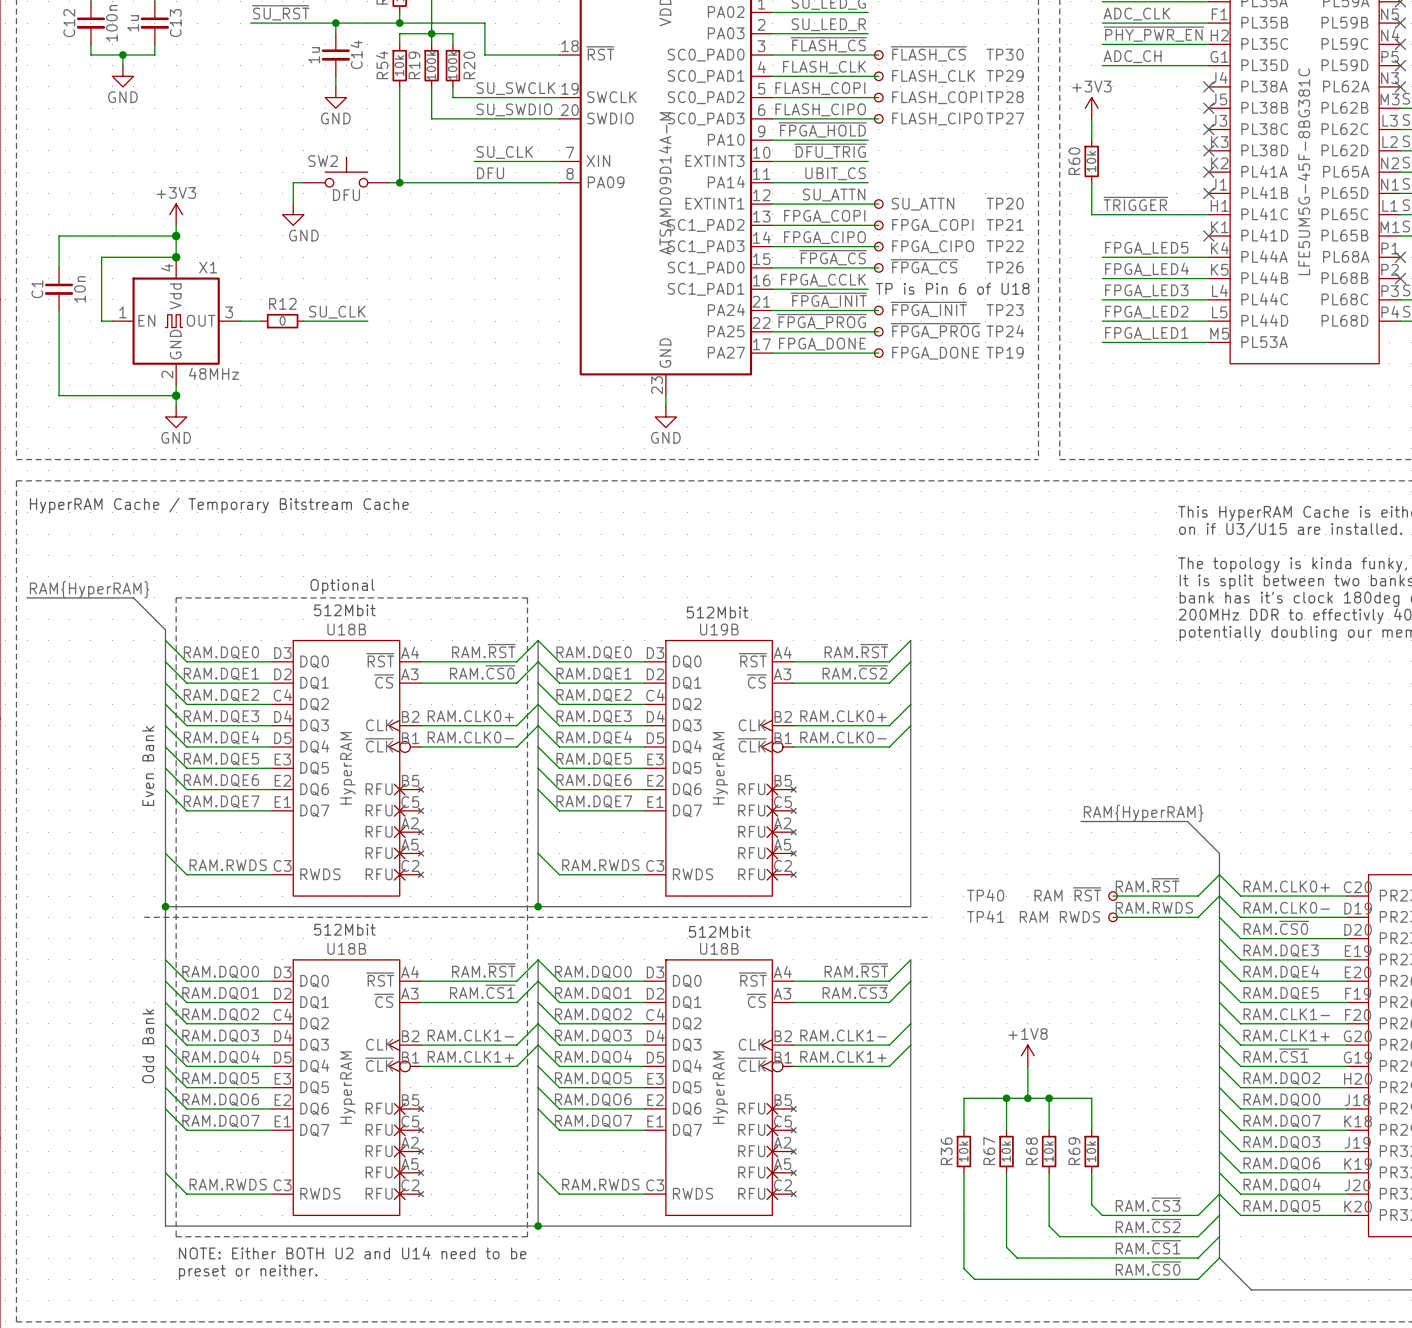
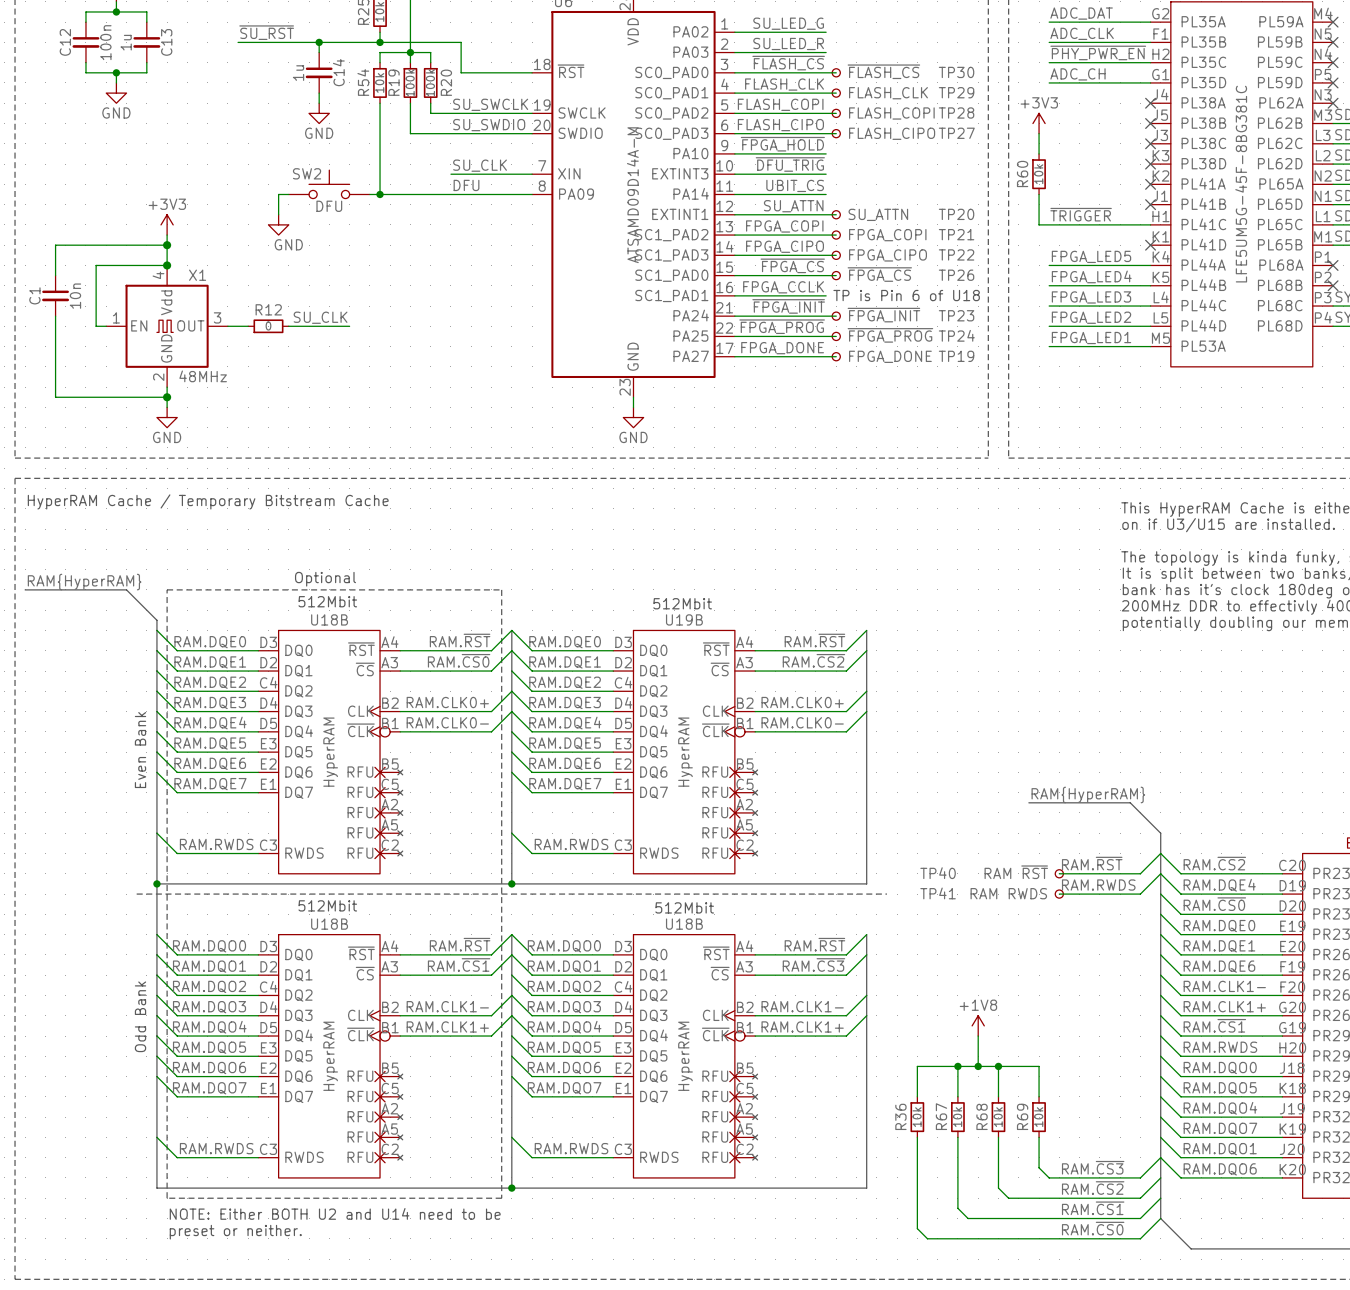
label: RAM.CLK0+ (1286, 886) -> RAM.~{CS2} (1214, 863)
label: RAM.CLK0- (1286, 907) -> RAM.DQE4 (1219, 885)
label: RAM.DQE3 (1281, 950) -> RAM.DQE0 (1219, 926)
label: RAM.DQE4 (1281, 971) -> RAM.DQE1 (1219, 946)
label: RAM.DQE5 (1281, 993) -> RAM.DQE6 (1219, 966)
label: RAM.DQO2 (1281, 1078) -> RAM.RWDS (1220, 1047)
label: RAM.DQO7 (1282, 1121) -> RAM.DQO5 (1220, 1088)
label: RAM.DQO3 (1281, 1142) -> RAM.DQO4 (1220, 1108)
label: RAM.DQO6 (1281, 1163) -> RAM.DQO7 (1220, 1128)
label: RAM.DQO4 (1282, 1184) -> RAM.DQO1 (1220, 1149)
label: RAM.DQO5 (1281, 1206) -> RAM.DQO6 (1220, 1169)

